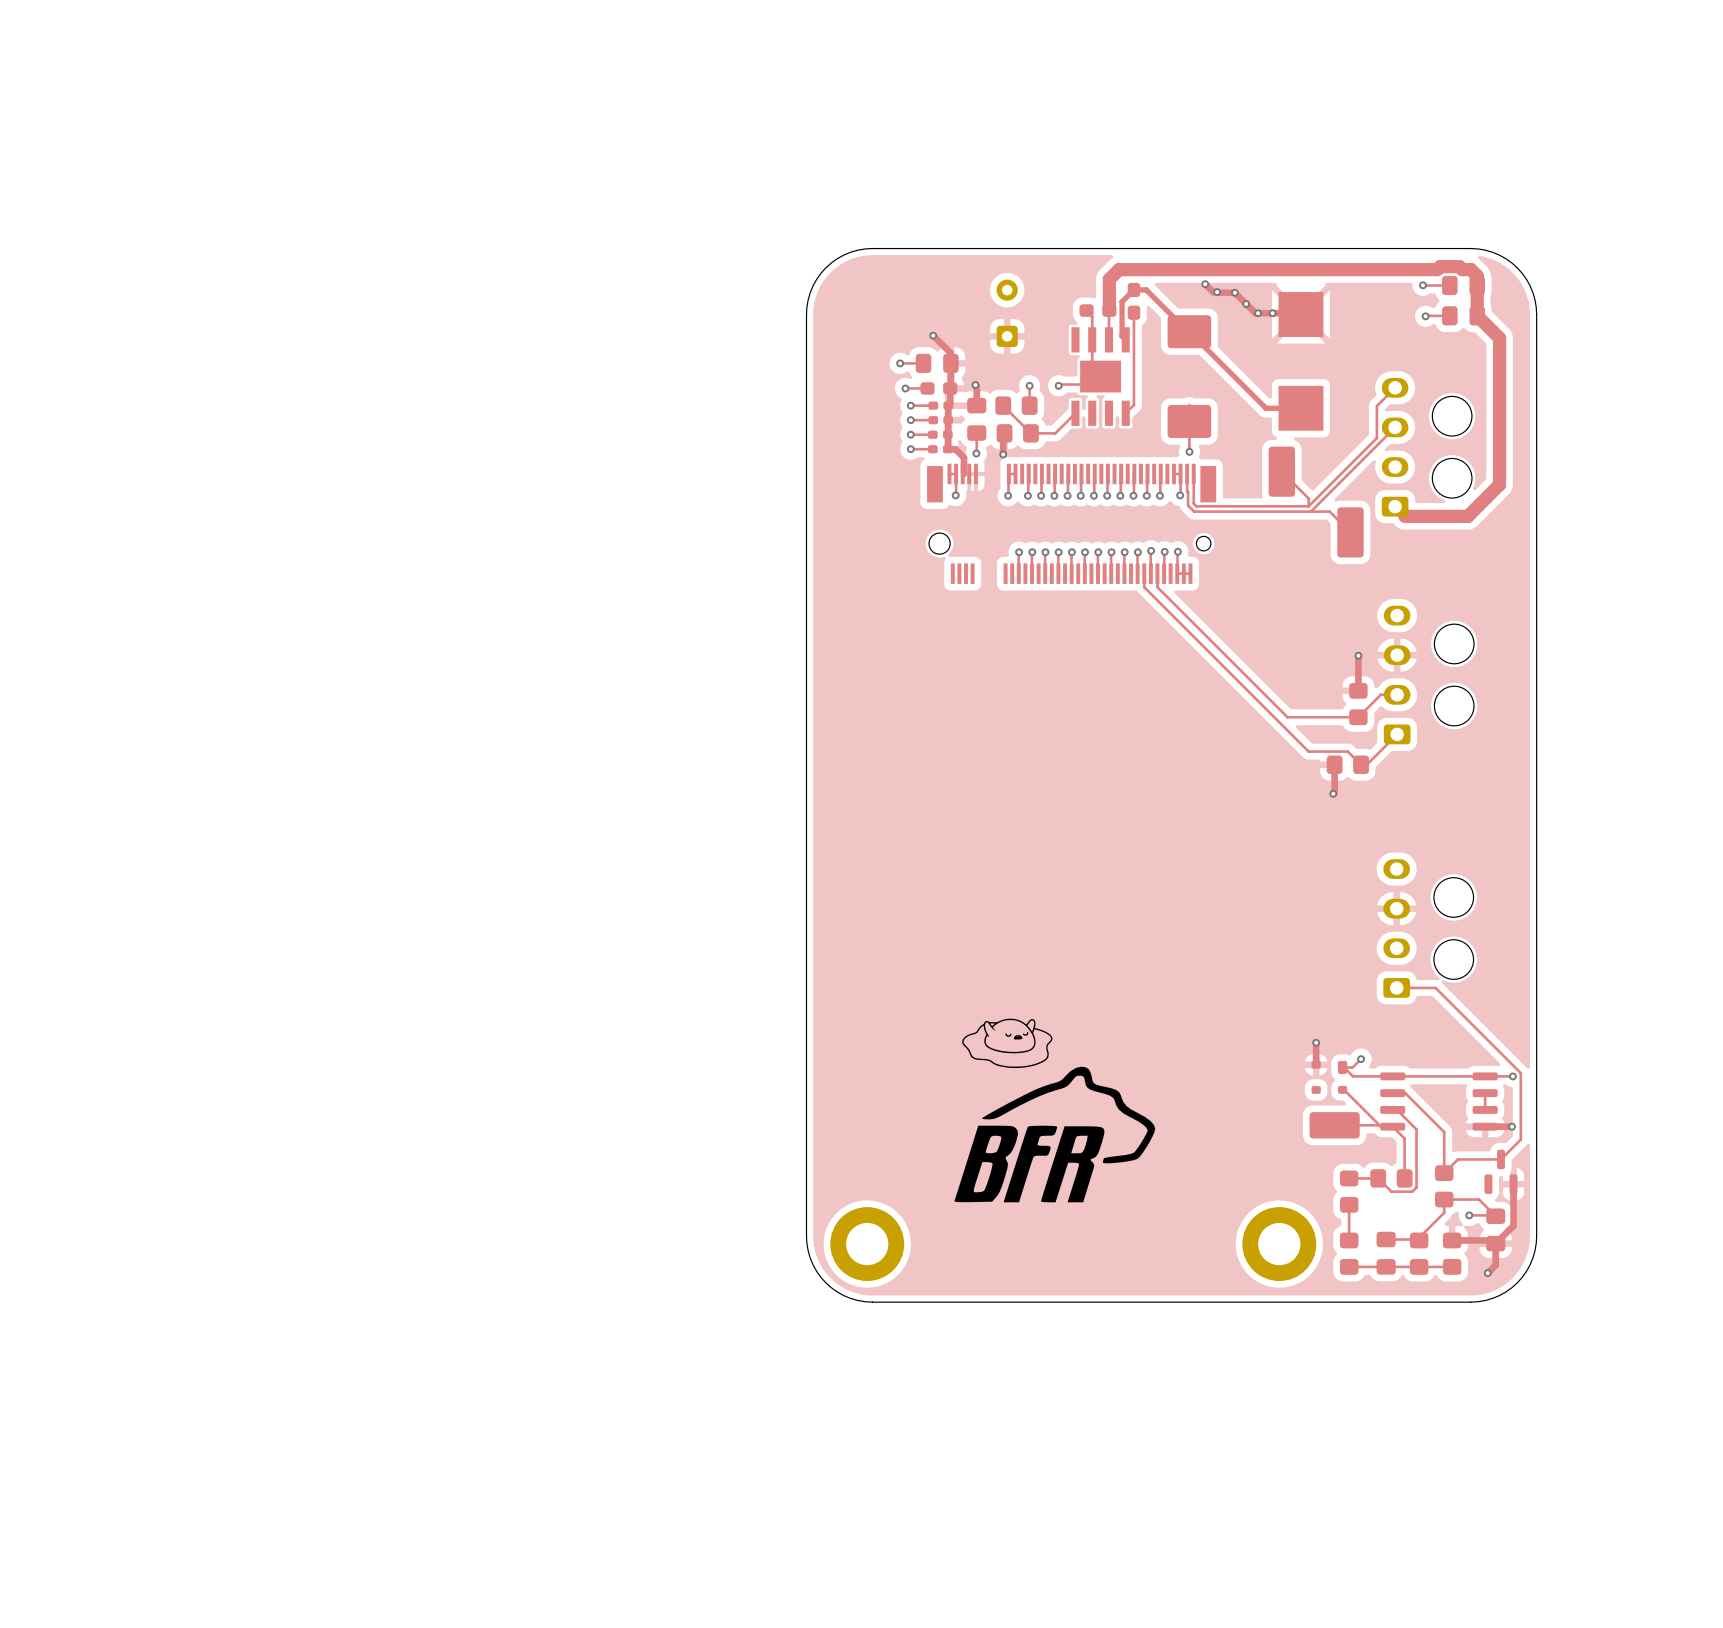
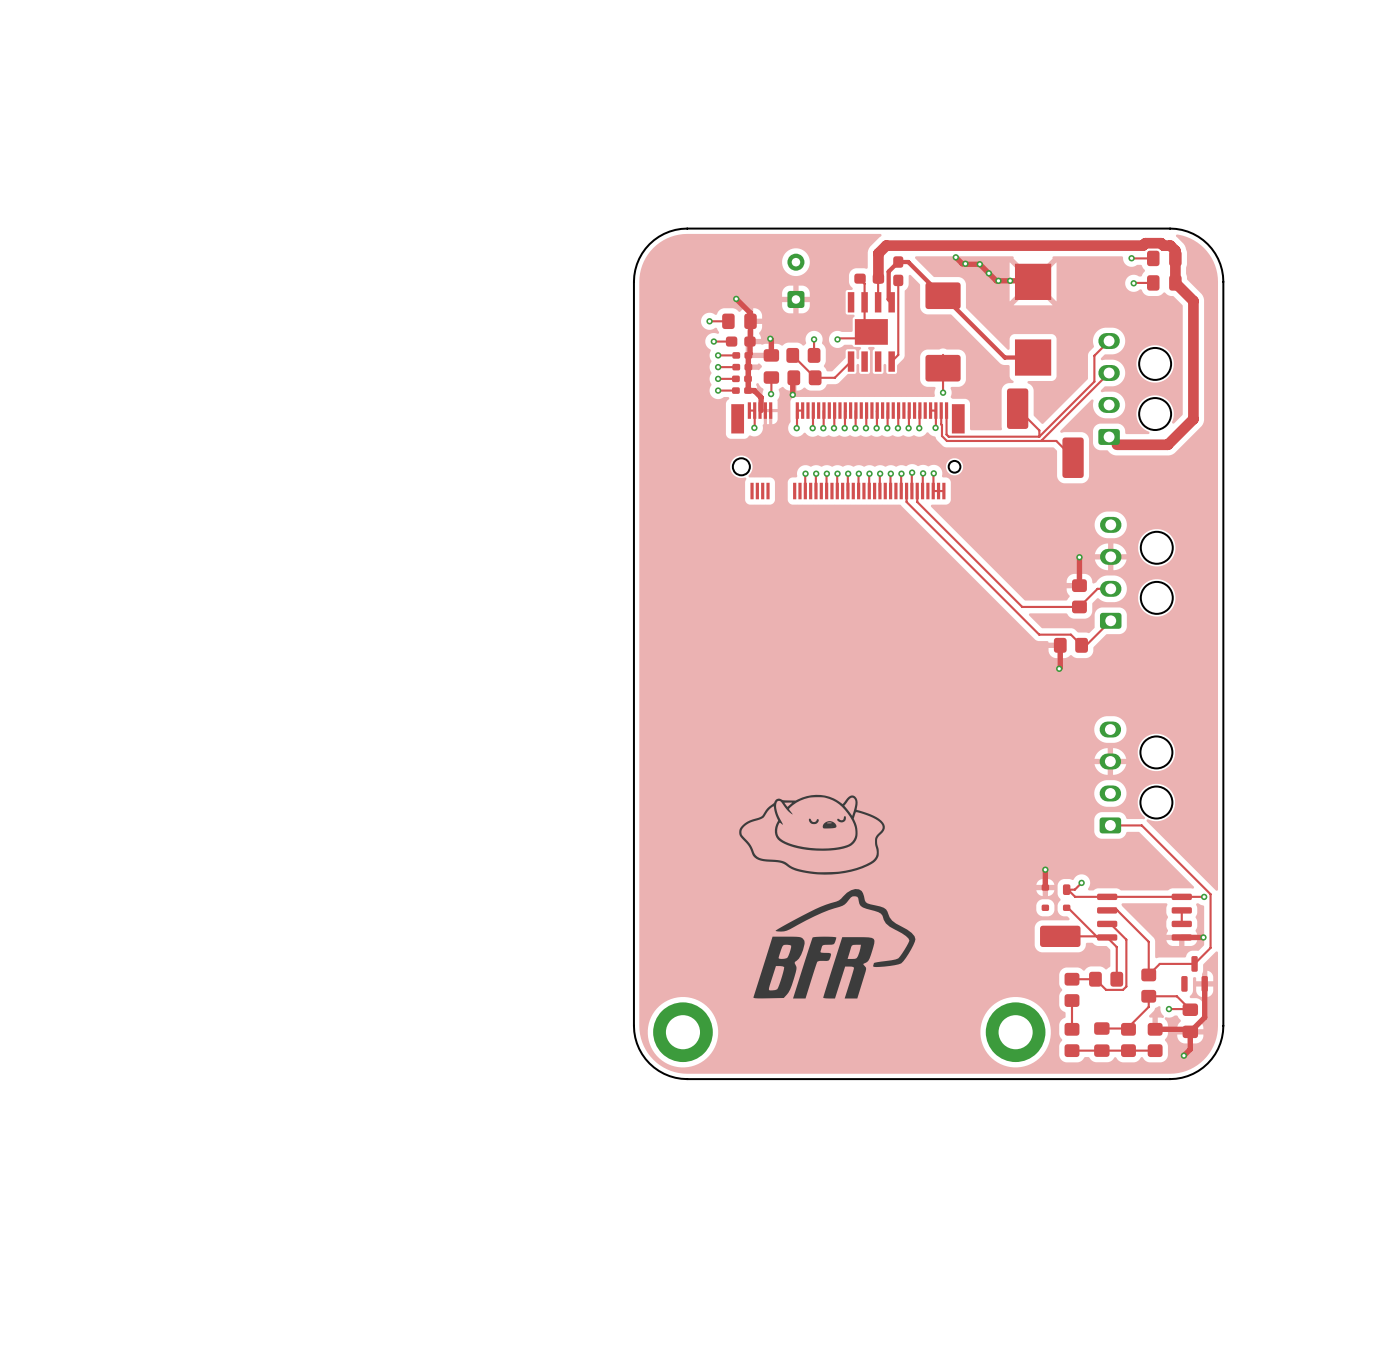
drawing: none -> [739, 794, 885, 875]
drawing: [962, 1018, 1053, 1069] -> none

